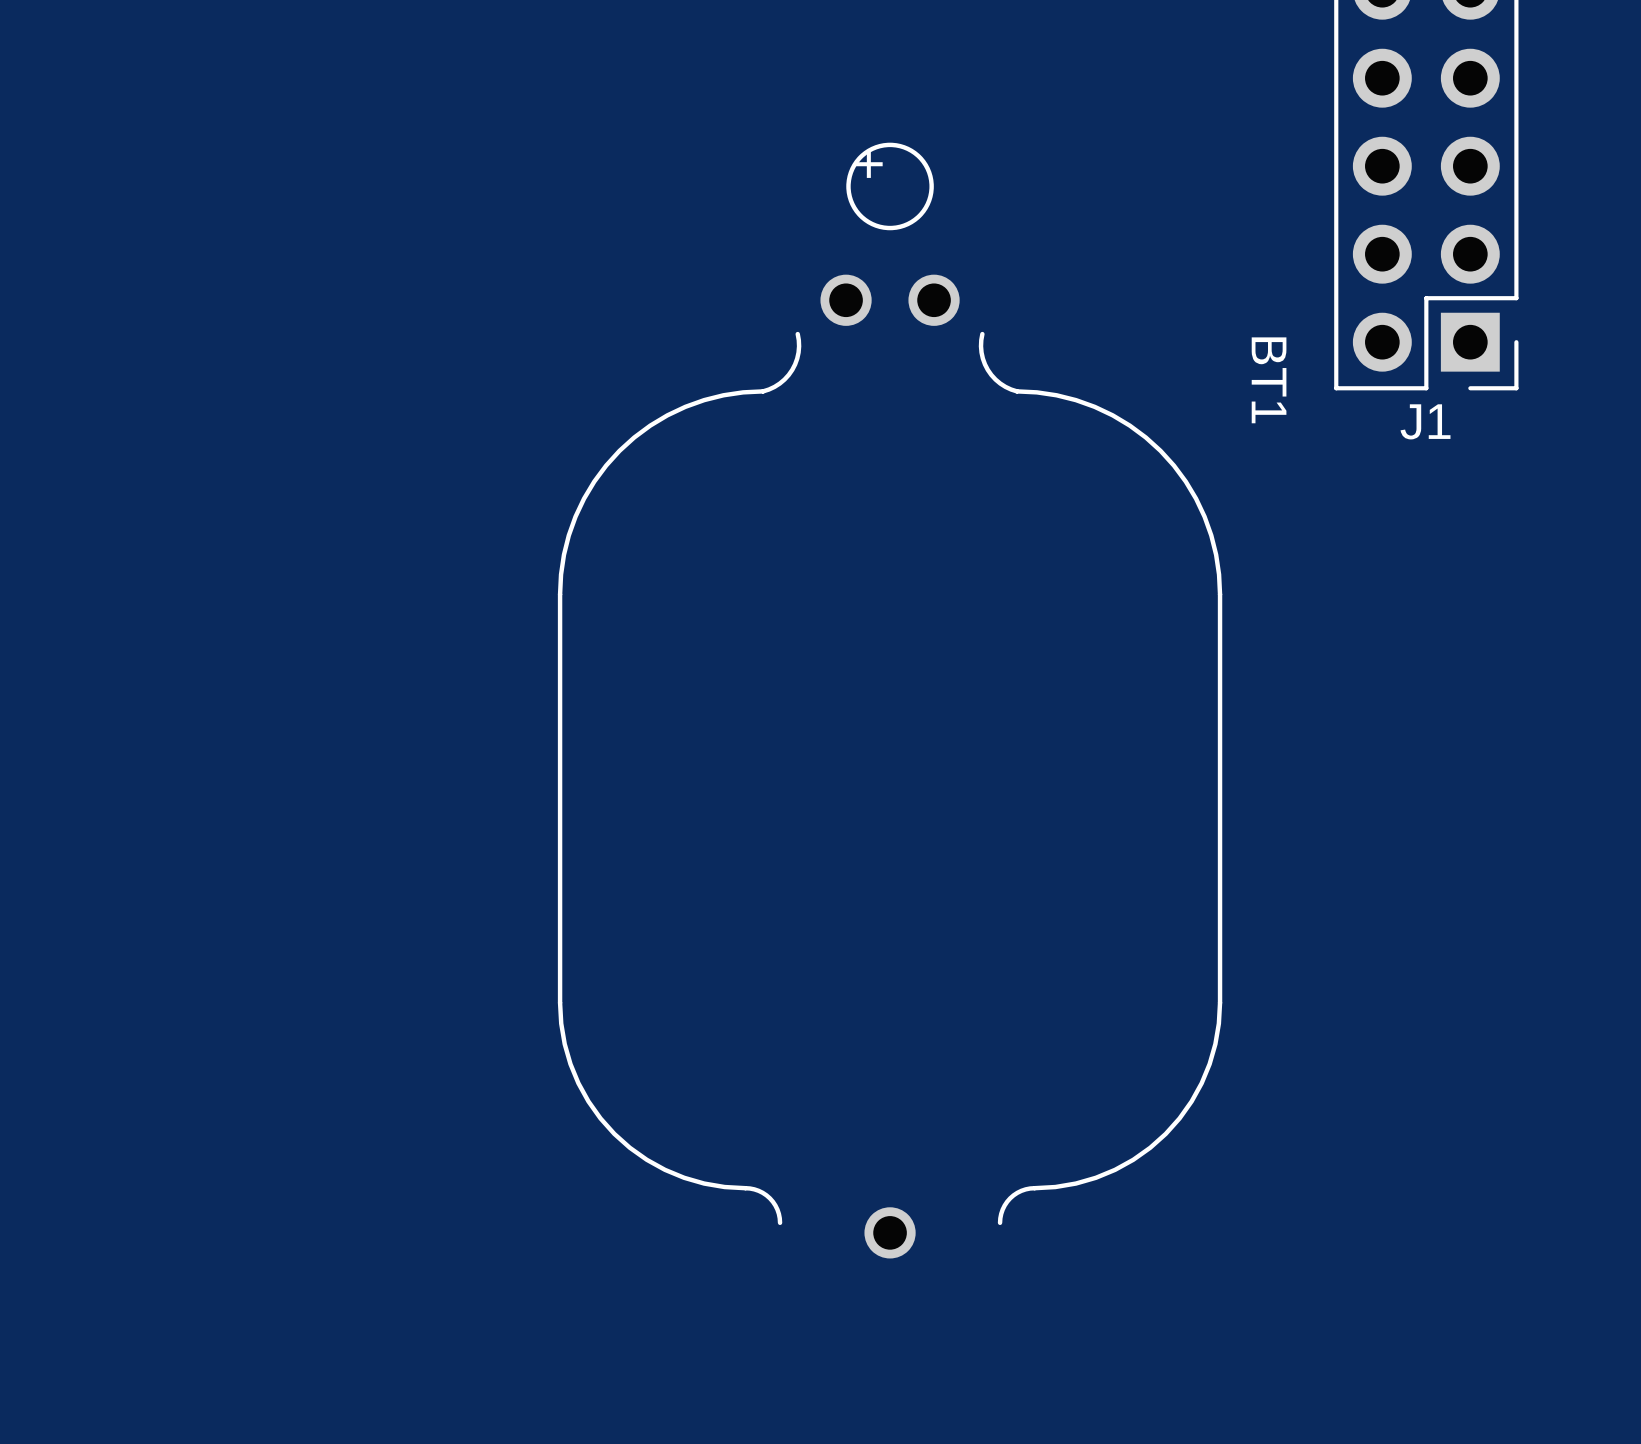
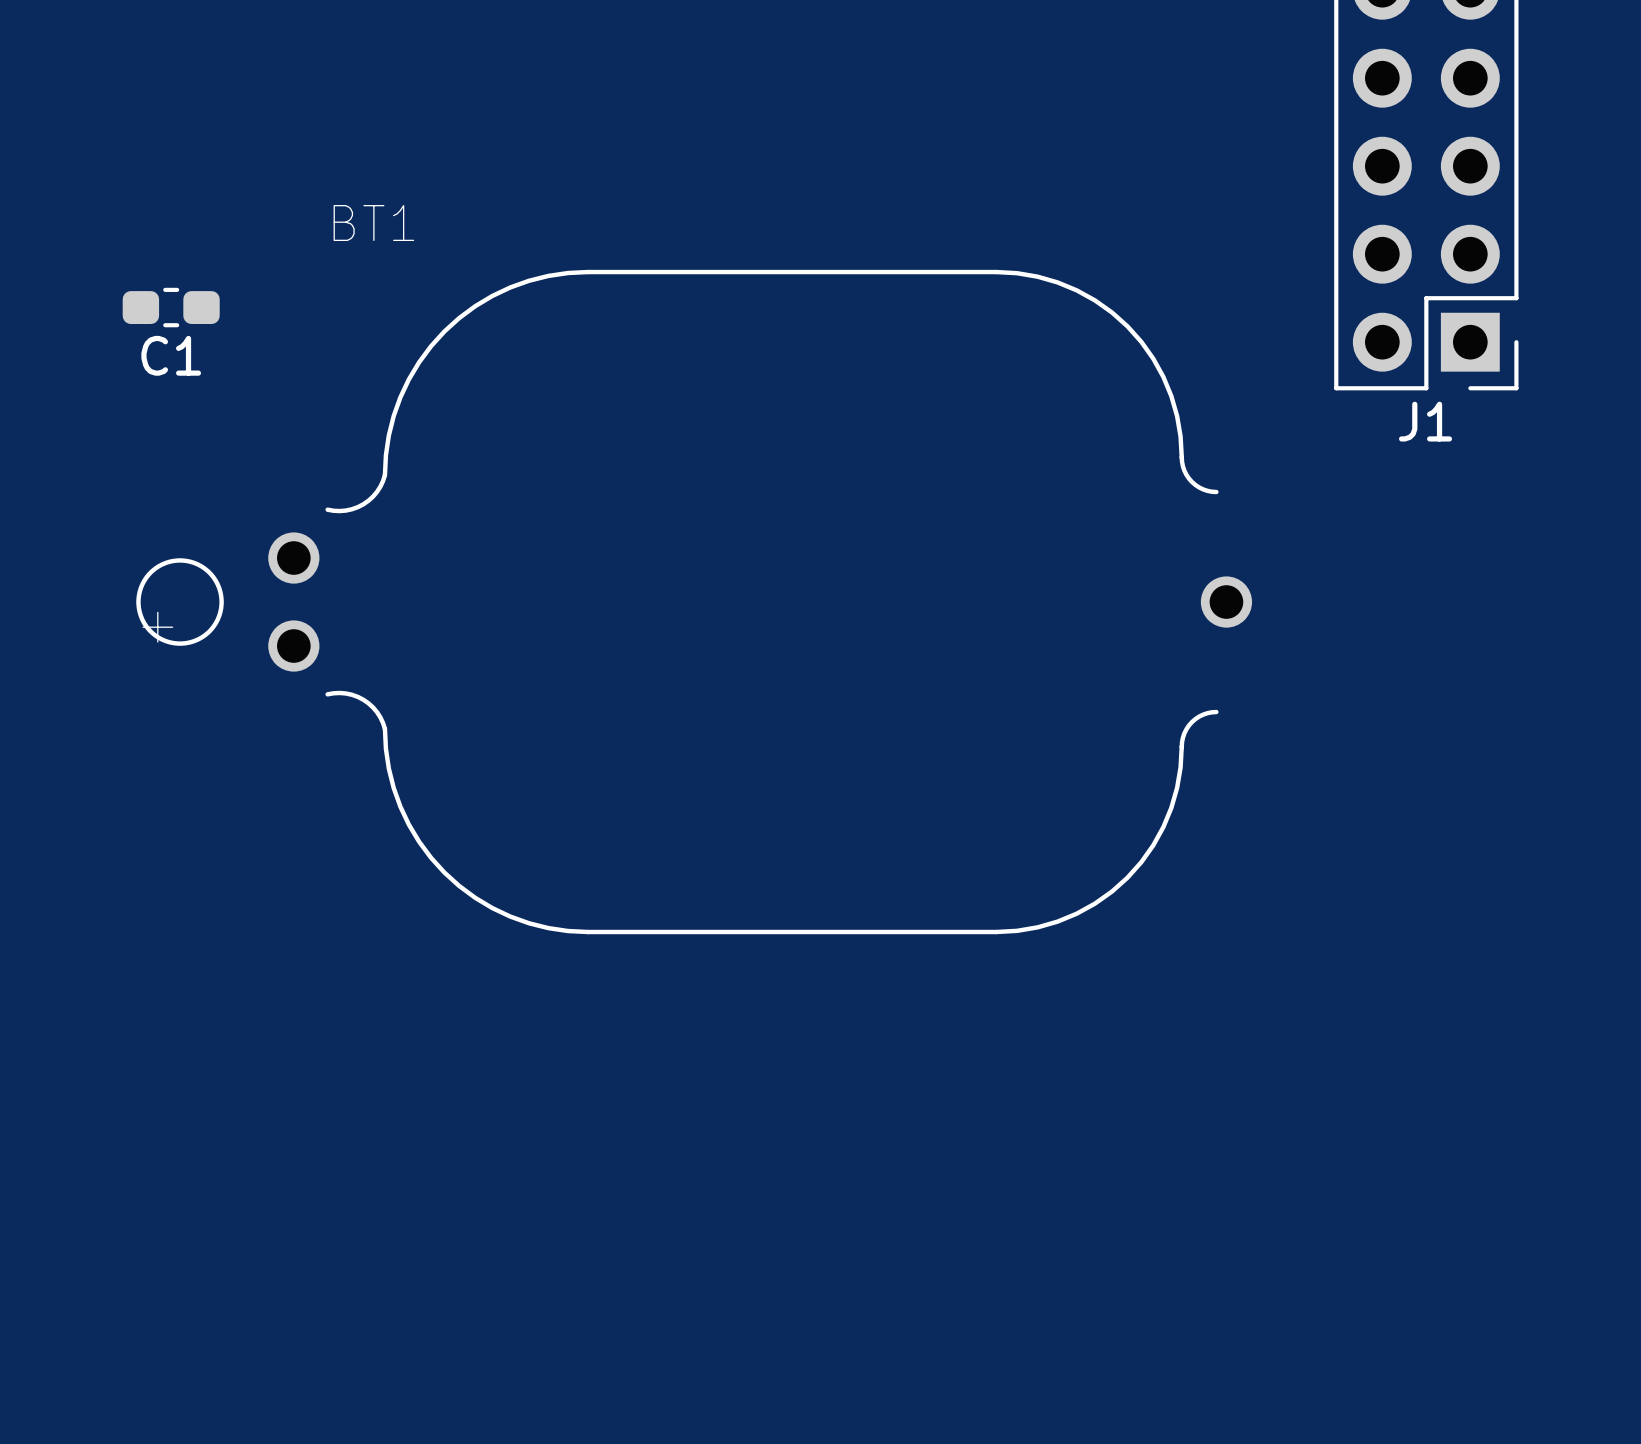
C1: none -> (171, 307)
BT1 rotation: 0° (890, 700) -> 90° counterclockwise (694, 602)

